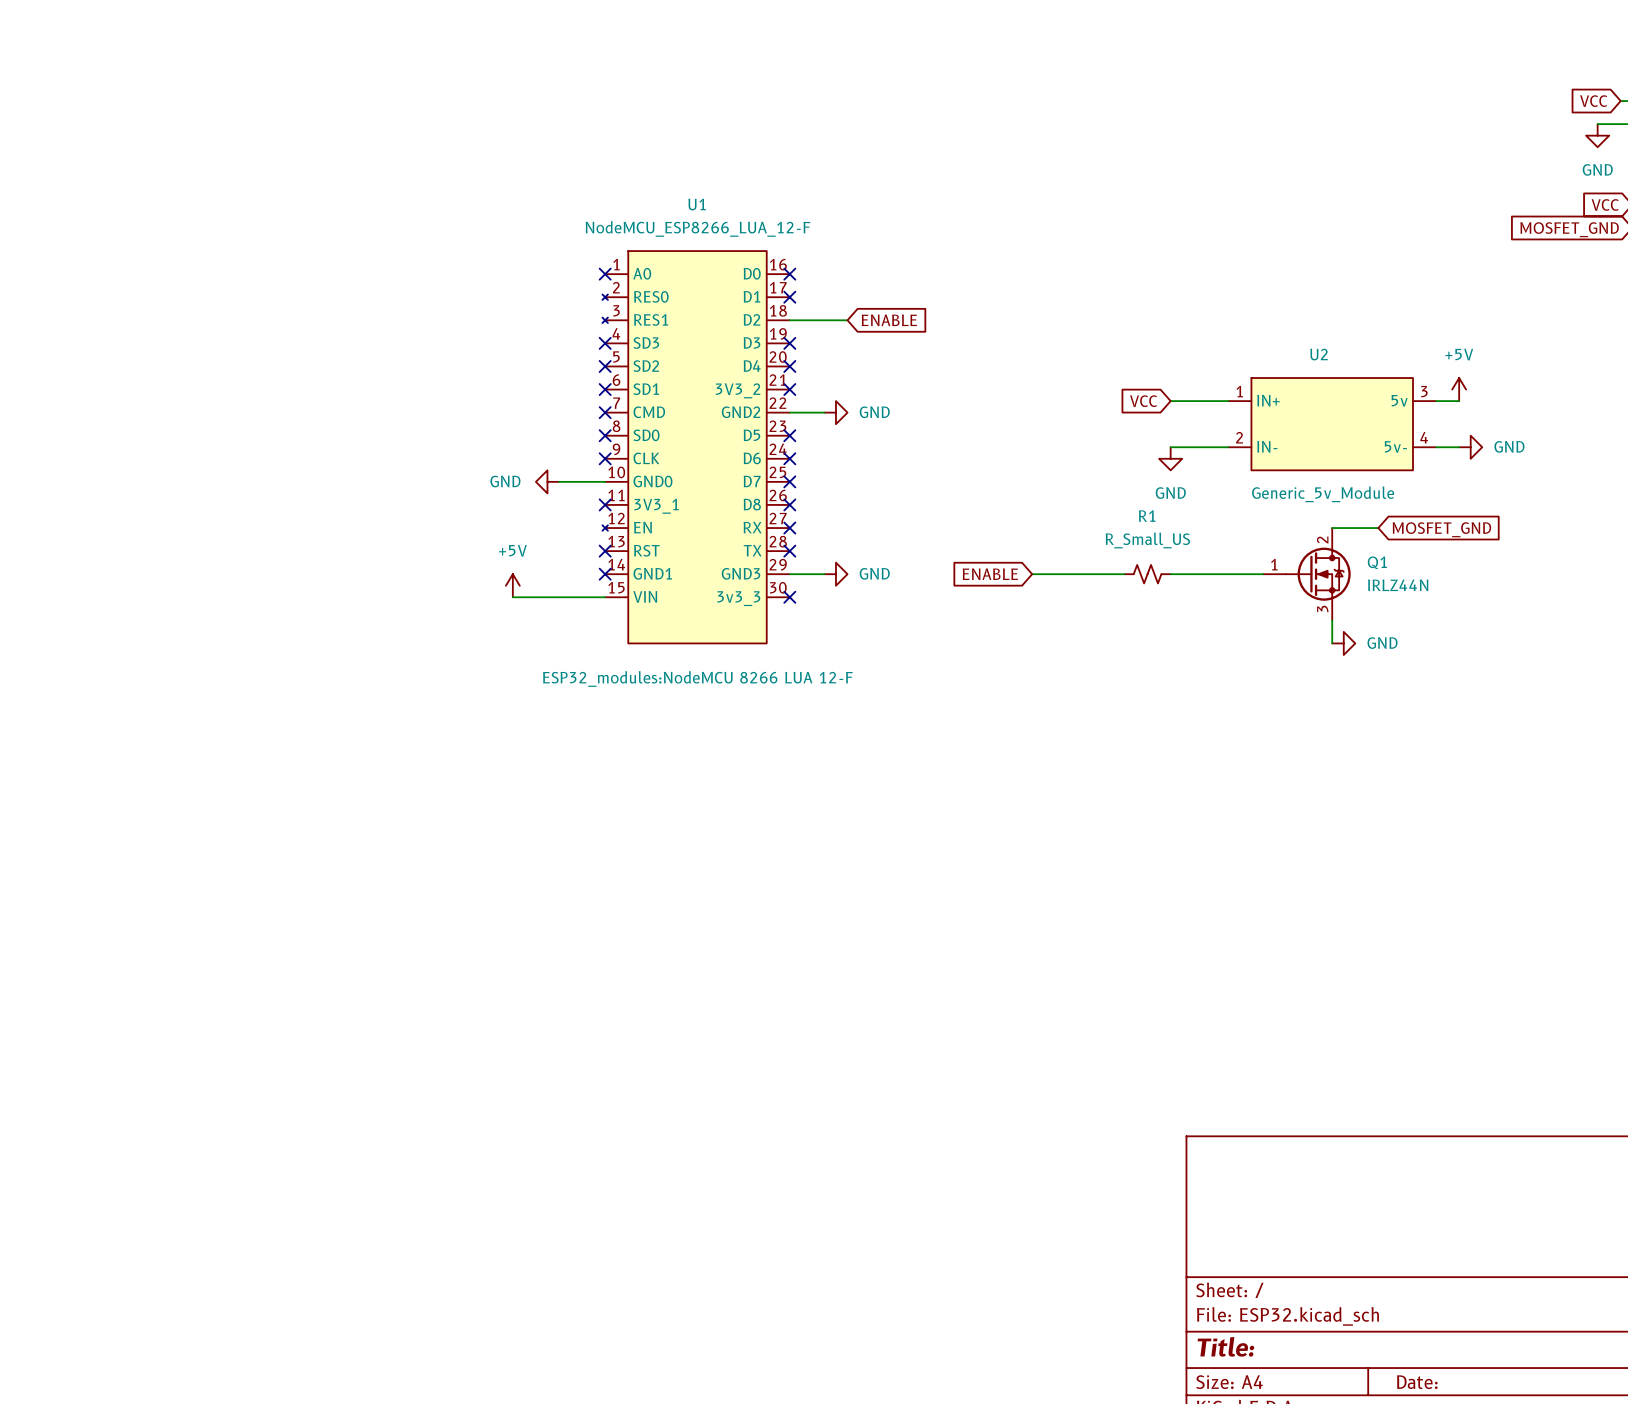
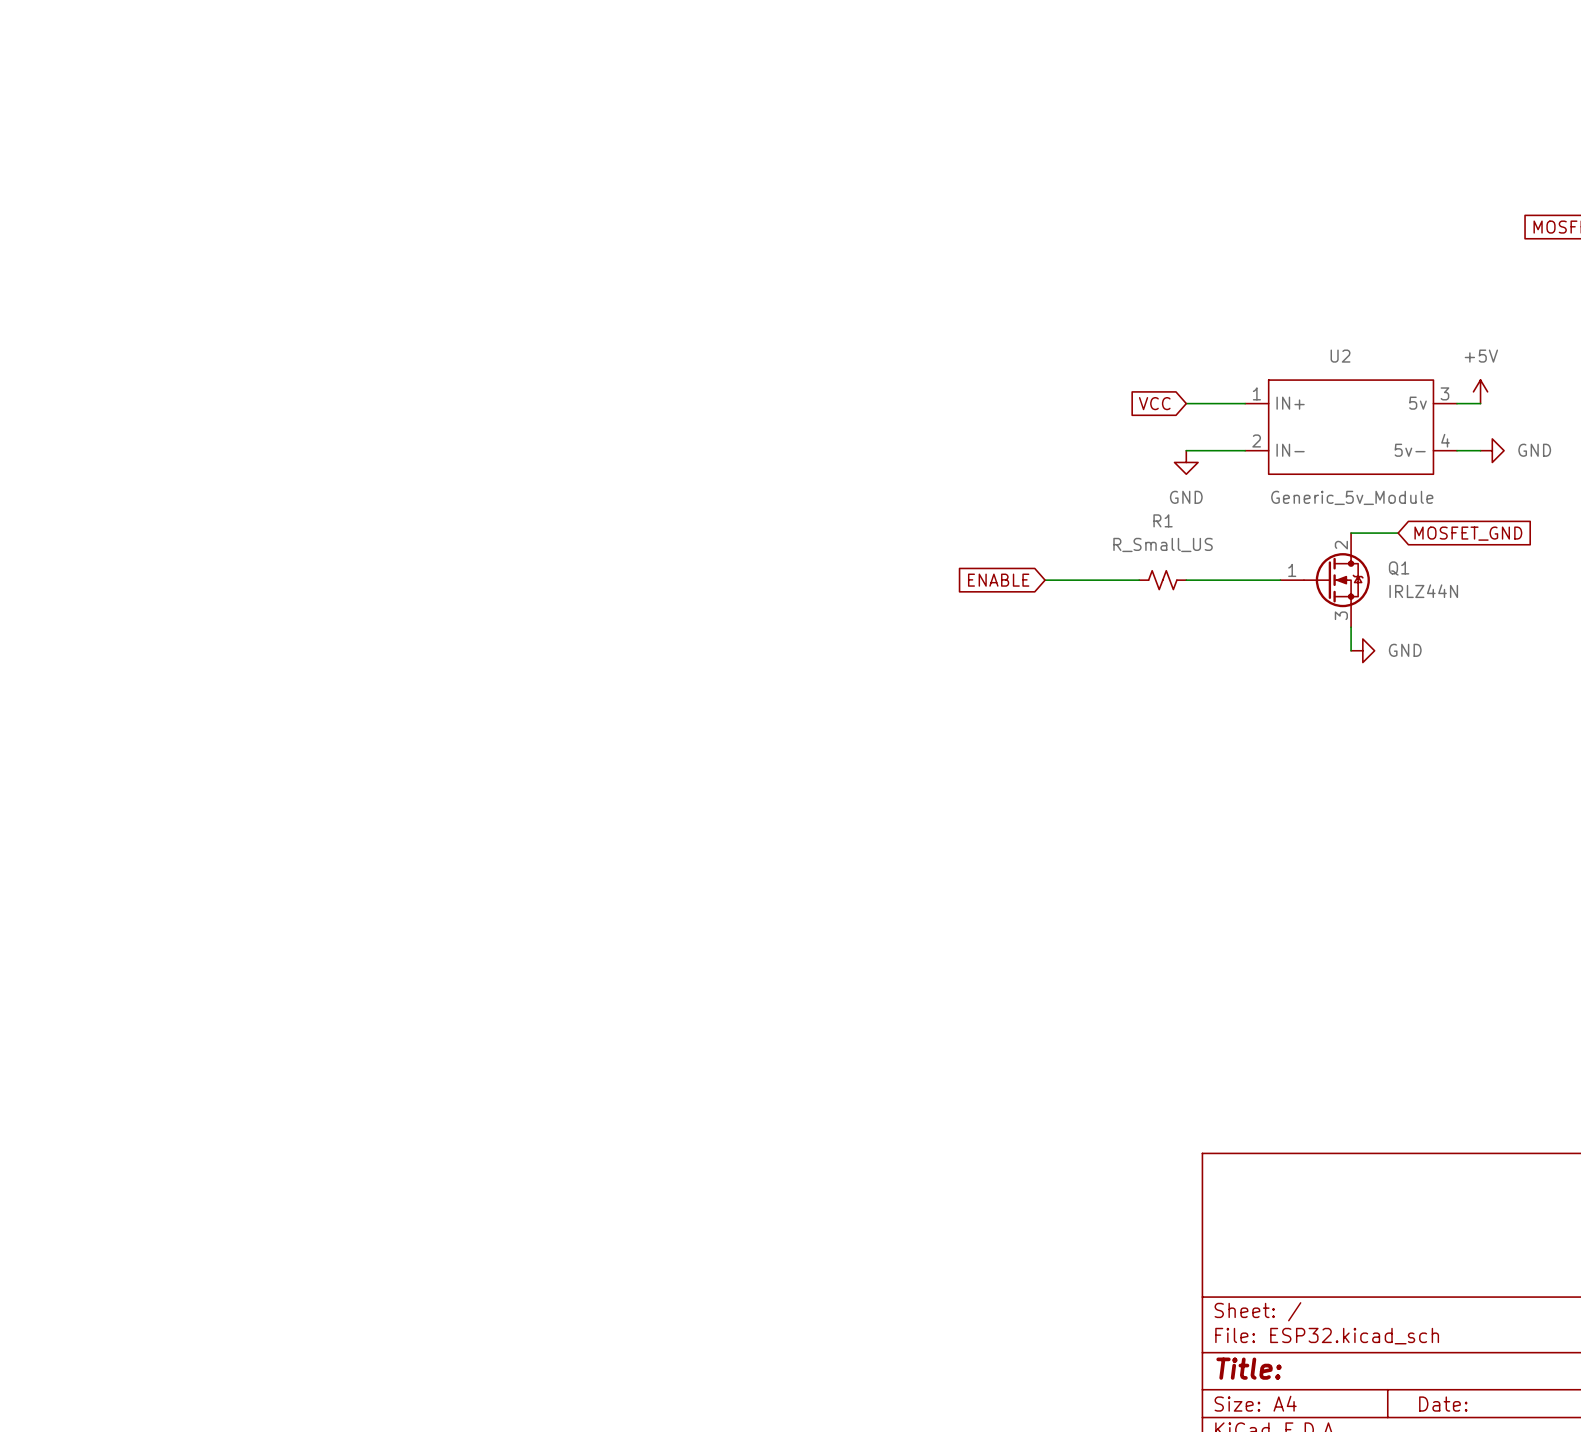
no-connect mark: (605, 274) -> none
no-connect mark: (789, 274) -> none
no-connect mark: (789, 297) -> none
wire: (789, 320) (847, 320) -> none
global label: ENABLE (889, 320) -> none
no-connect mark: (605, 343) -> none
no-connect mark: (789, 343) -> none
no-connect mark: (605, 366) -> none
no-connect mark: (789, 366) -> none
no-connect mark: (605, 389) -> none
no-connect mark: (789, 389) -> none
no-connect mark: (605, 412) -> none
wire: (789, 412) (824, 412) -> none
power symbol: GND (835, 412) -> none
no-connect mark: (605, 435) -> none
no-connect mark: (789, 435) -> none
U1: NodeMCU_ESP8266_LUA_12-F (696, 447) -> none
no-connect mark: (605, 458) -> none
no-connect mark: (789, 458) -> none
power symbol: GND (547, 481) -> none
wire: (559, 481) (605, 481) -> none
no-connect mark: (789, 481) -> none
no-connect mark: (605, 504) -> none
no-connect mark: (789, 504) -> none
no-connect mark: (789, 528) -> none
no-connect mark: (605, 551) -> none
no-connect mark: (789, 551) -> none
no-connect mark: (605, 574) -> none
wire: (789, 574) (824, 574) -> none
power symbol: GND (835, 574) -> none
power symbol: +5V (512, 585) -> none
wire: (512, 597) (605, 597) -> none
no-connect mark: (789, 597) -> none

